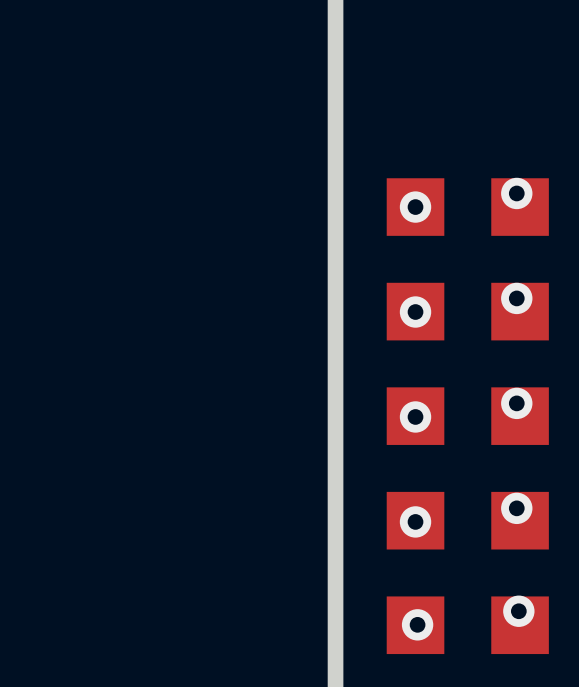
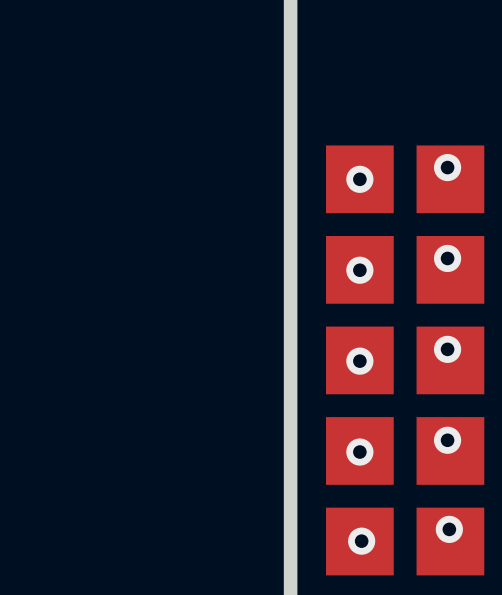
part footprint: [386, 178, 445, 236] -> [326, 145, 394, 214]
part footprint: [491, 178, 549, 236] -> [416, 145, 485, 214]
part footprint: [386, 282, 445, 341] -> [326, 236, 394, 304]
part footprint: [491, 282, 549, 341] -> [416, 236, 485, 304]
part footprint: [386, 387, 445, 445] -> [326, 326, 394, 395]
part footprint: [491, 387, 549, 445] -> [416, 326, 485, 395]
part footprint: [386, 491, 445, 550] -> [326, 417, 394, 485]
part footprint: [491, 491, 549, 550] -> [416, 417, 485, 485]
part footprint: [386, 596, 445, 655] -> [326, 507, 394, 576]
part footprint: [491, 596, 549, 655] -> [416, 507, 485, 576]

